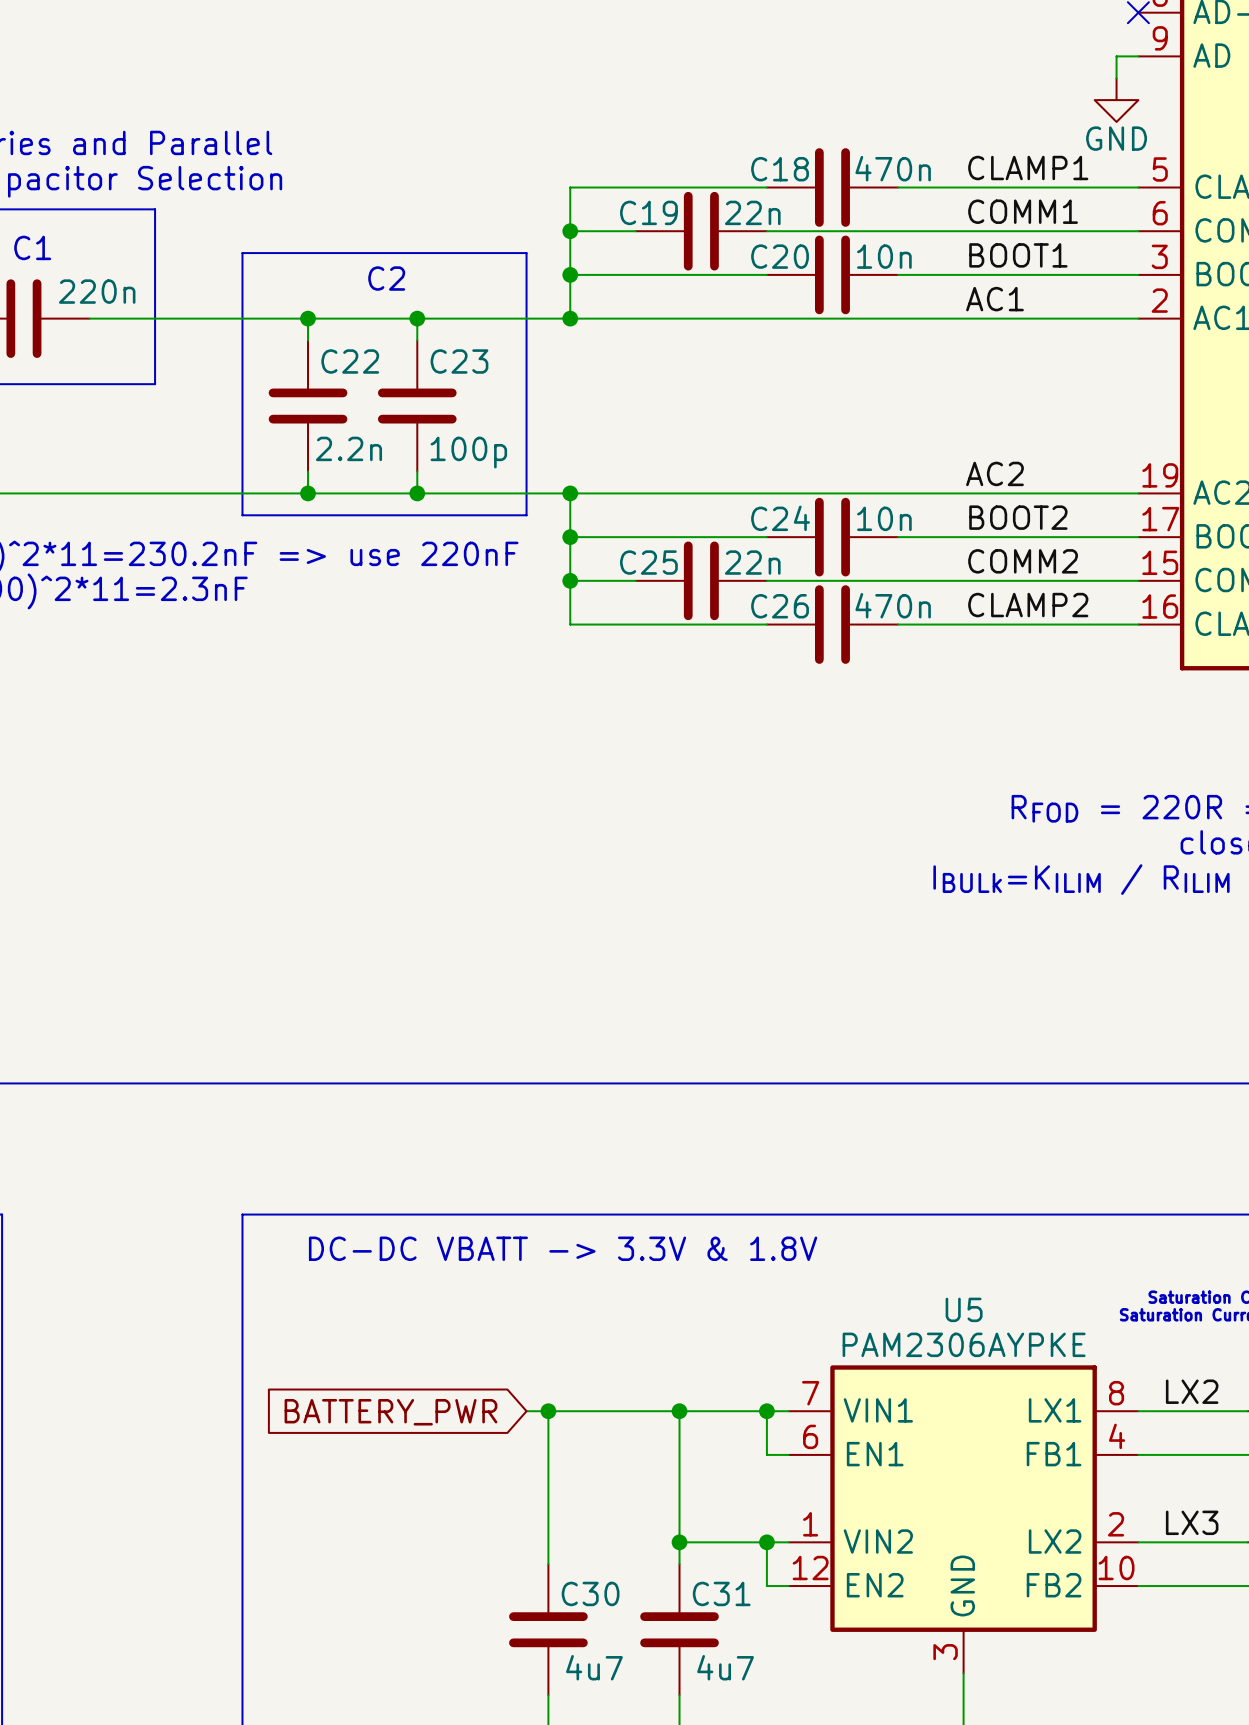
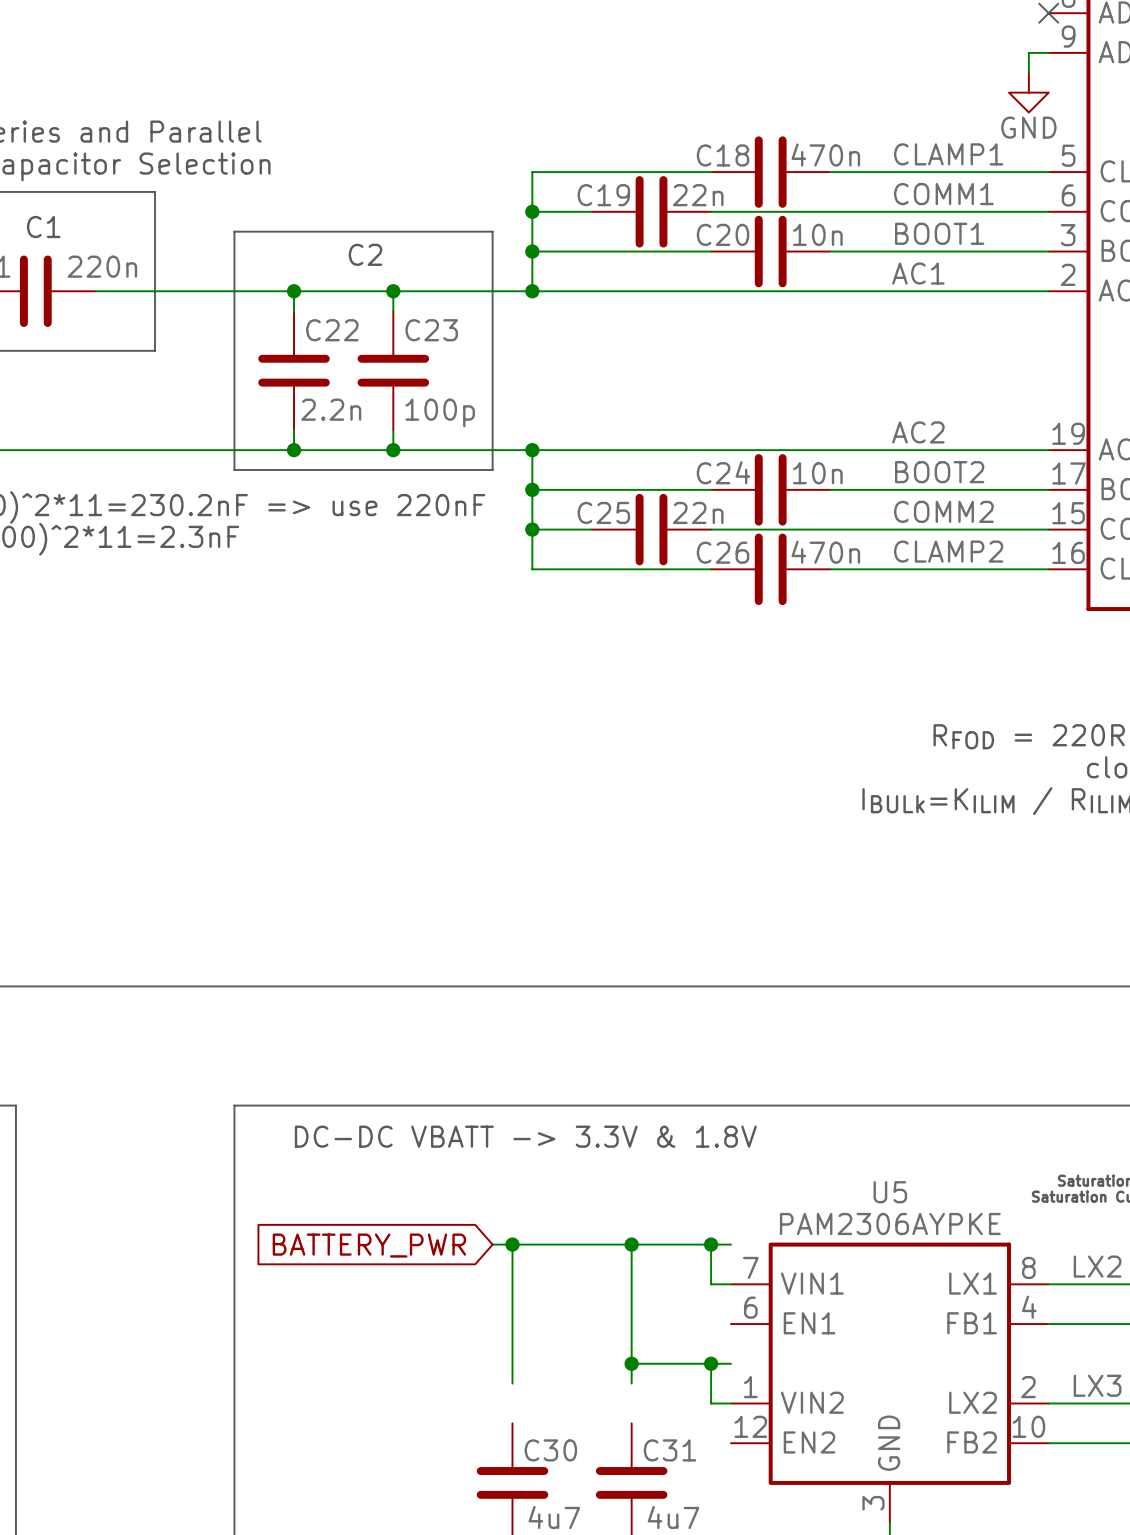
wire: none -> (492, 1244) (730, 1244)
junction: none -> (631, 1244)
wire: none -> (711, 1244) (711, 1284)
junction: none -> (711, 1244)
wire: (526, 1411) (766, 1411) (766, 1454) (788, 1454) -> none
junction position: (548, 1411) -> (512, 1244)
junction: (679, 1411) -> none
junction: (766, 1411) -> none
global label position: BATTERY_PWR (390, 1412) -> BATTERY_PWR (369, 1245)
wire: none -> (631, 1363) (730, 1363)
junction: none -> (631, 1363)
wire: none -> (711, 1363) (711, 1403)
junction: none -> (711, 1363)
wire: (548, 1520) (548, 1564) -> (512, 1244) (512, 1284)
wire: (679, 1520) (679, 1564) -> (631, 1244) (631, 1284)
wire: (679, 1542) (766, 1542) (766, 1586) (788, 1586) -> none
junction: (679, 1542) -> none
junction: (766, 1542) -> none

